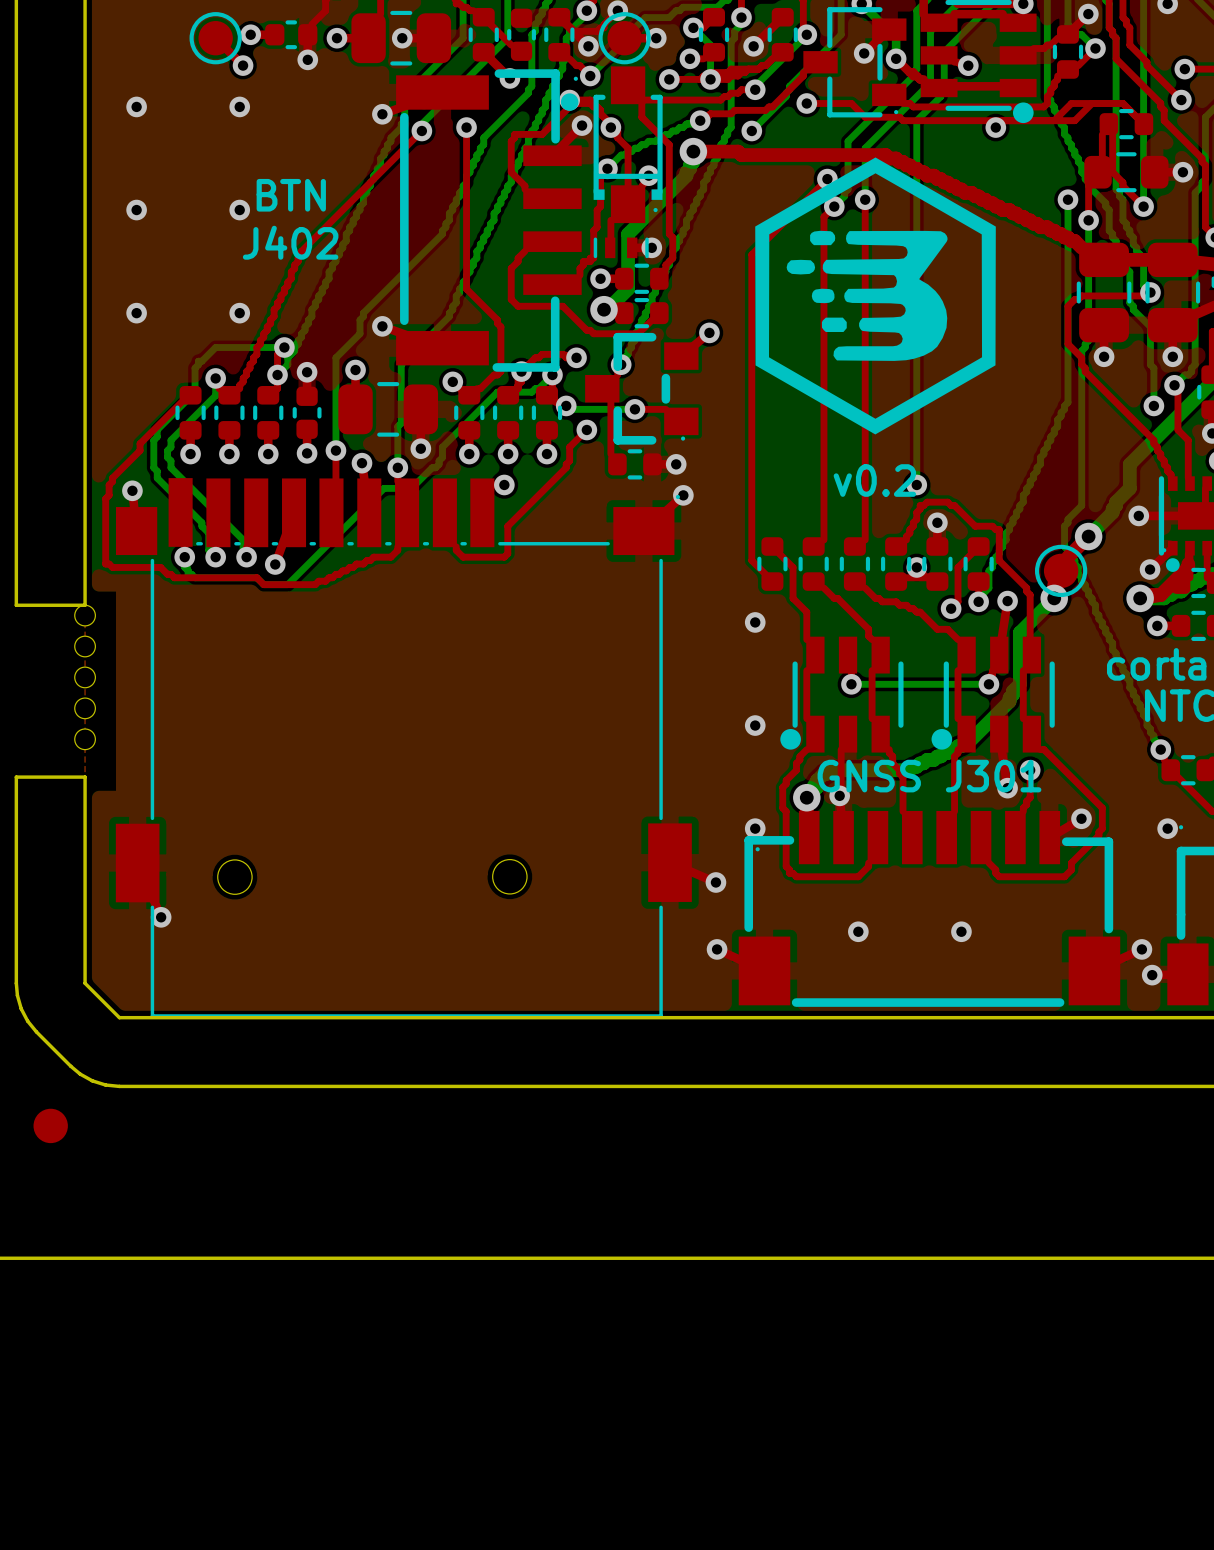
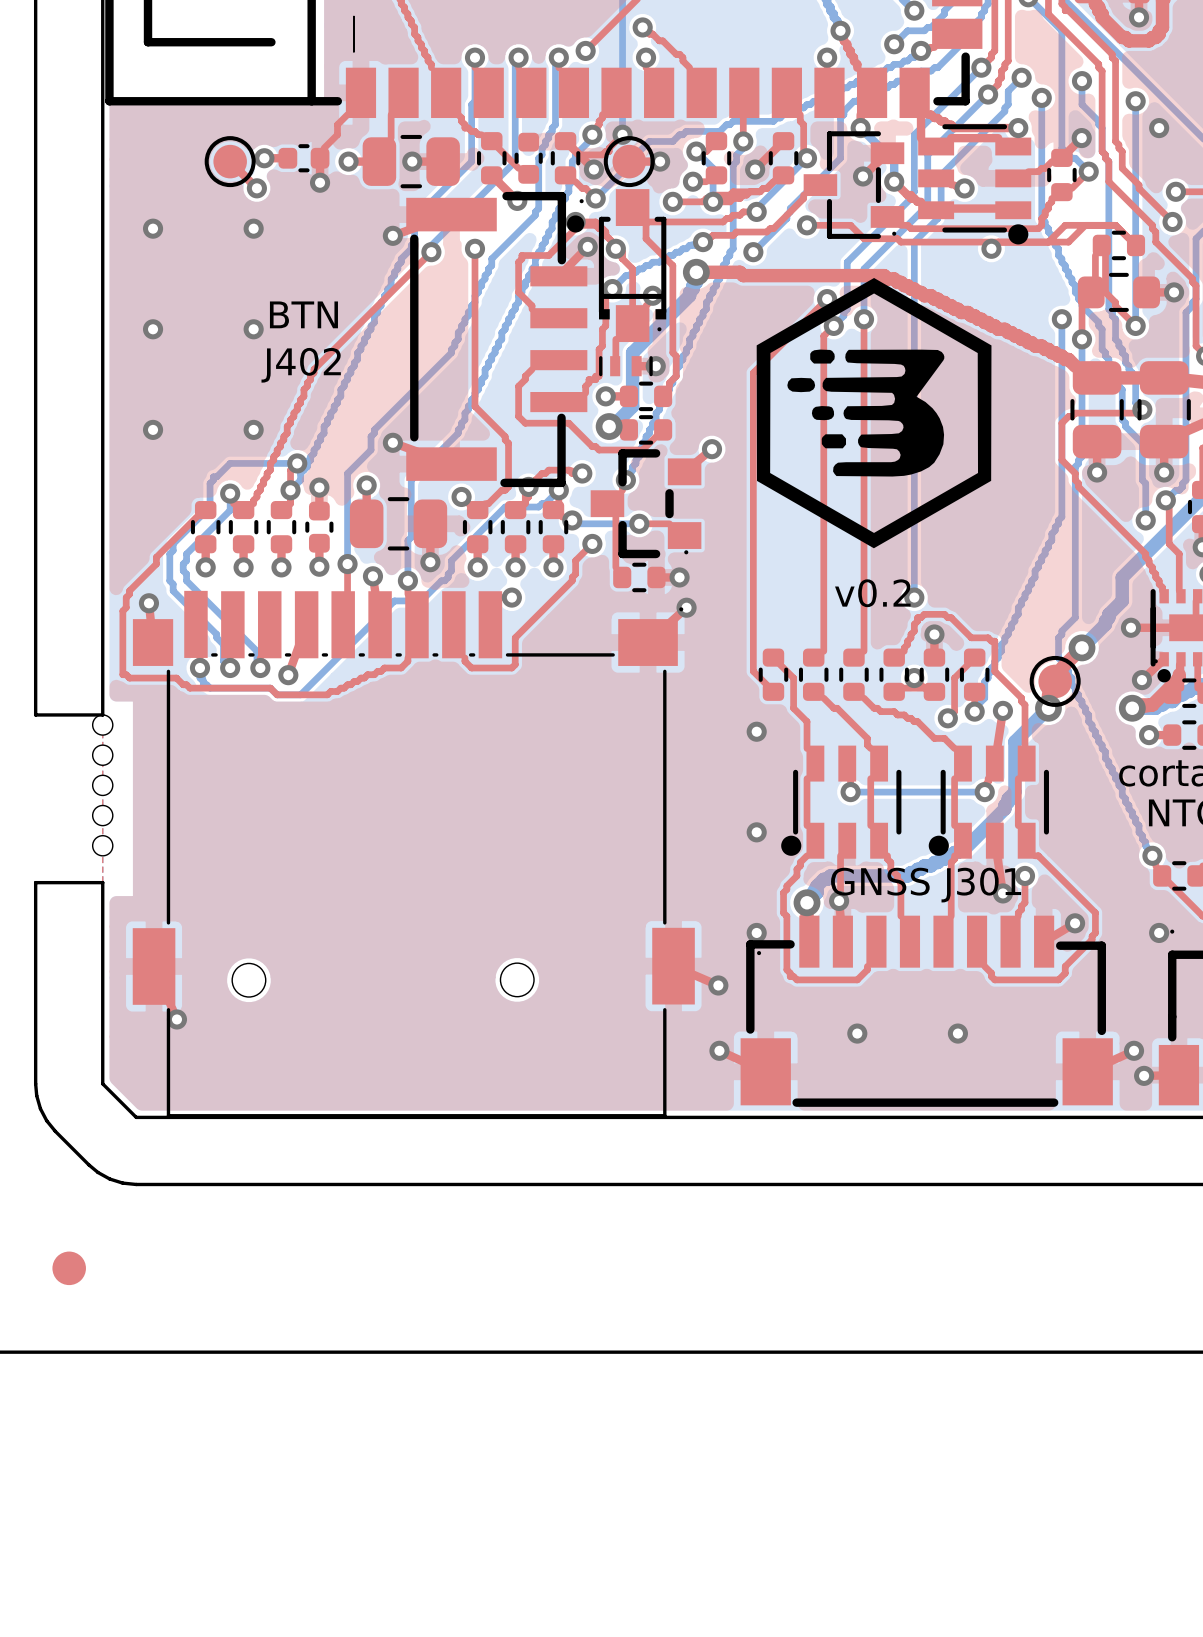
part position: (50, 1125) -> (69, 1268)

